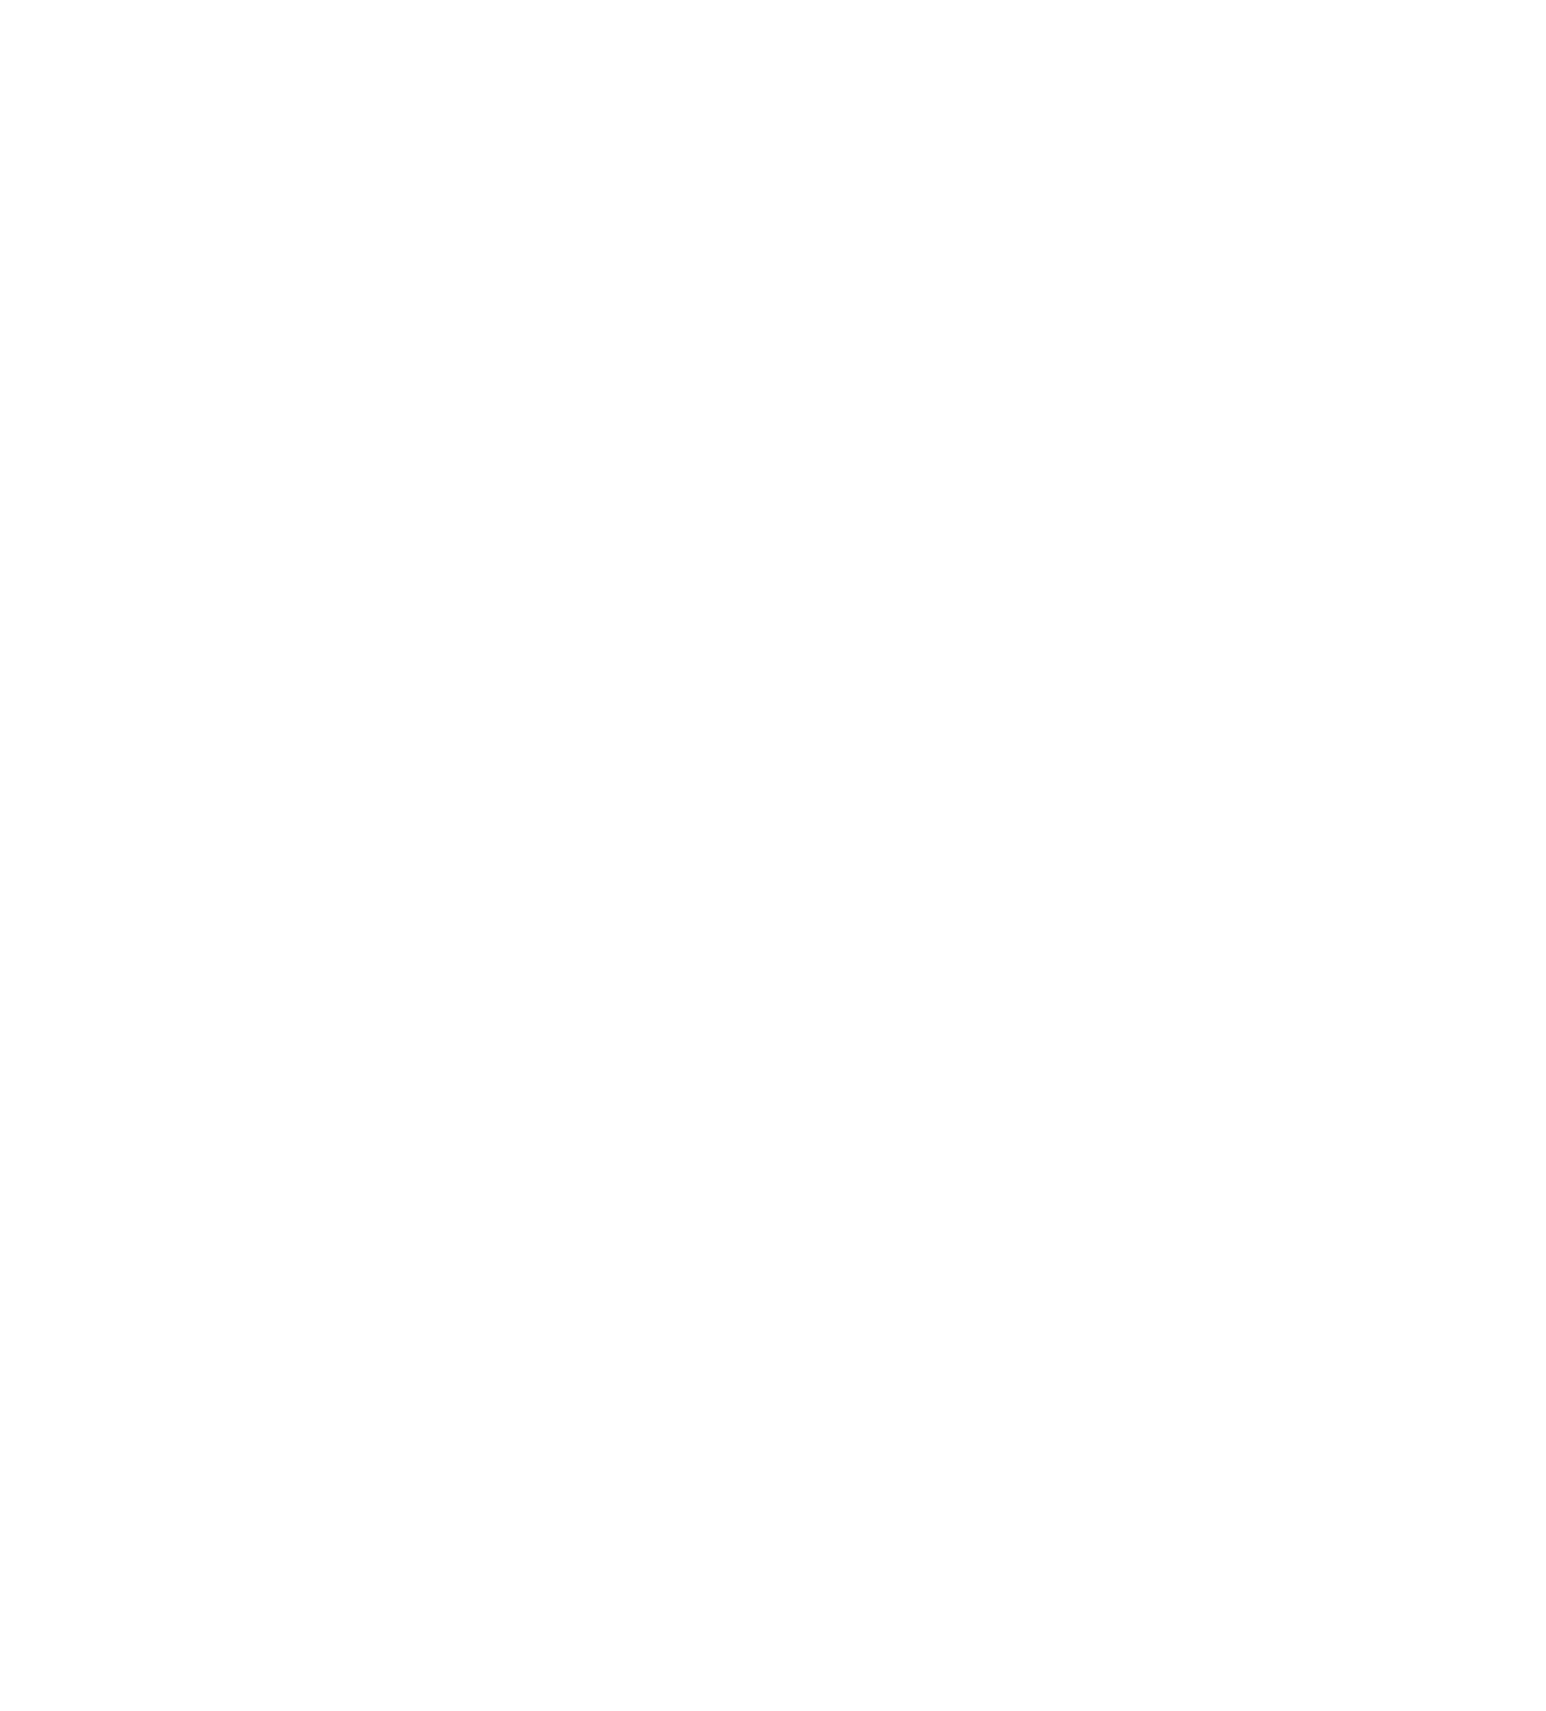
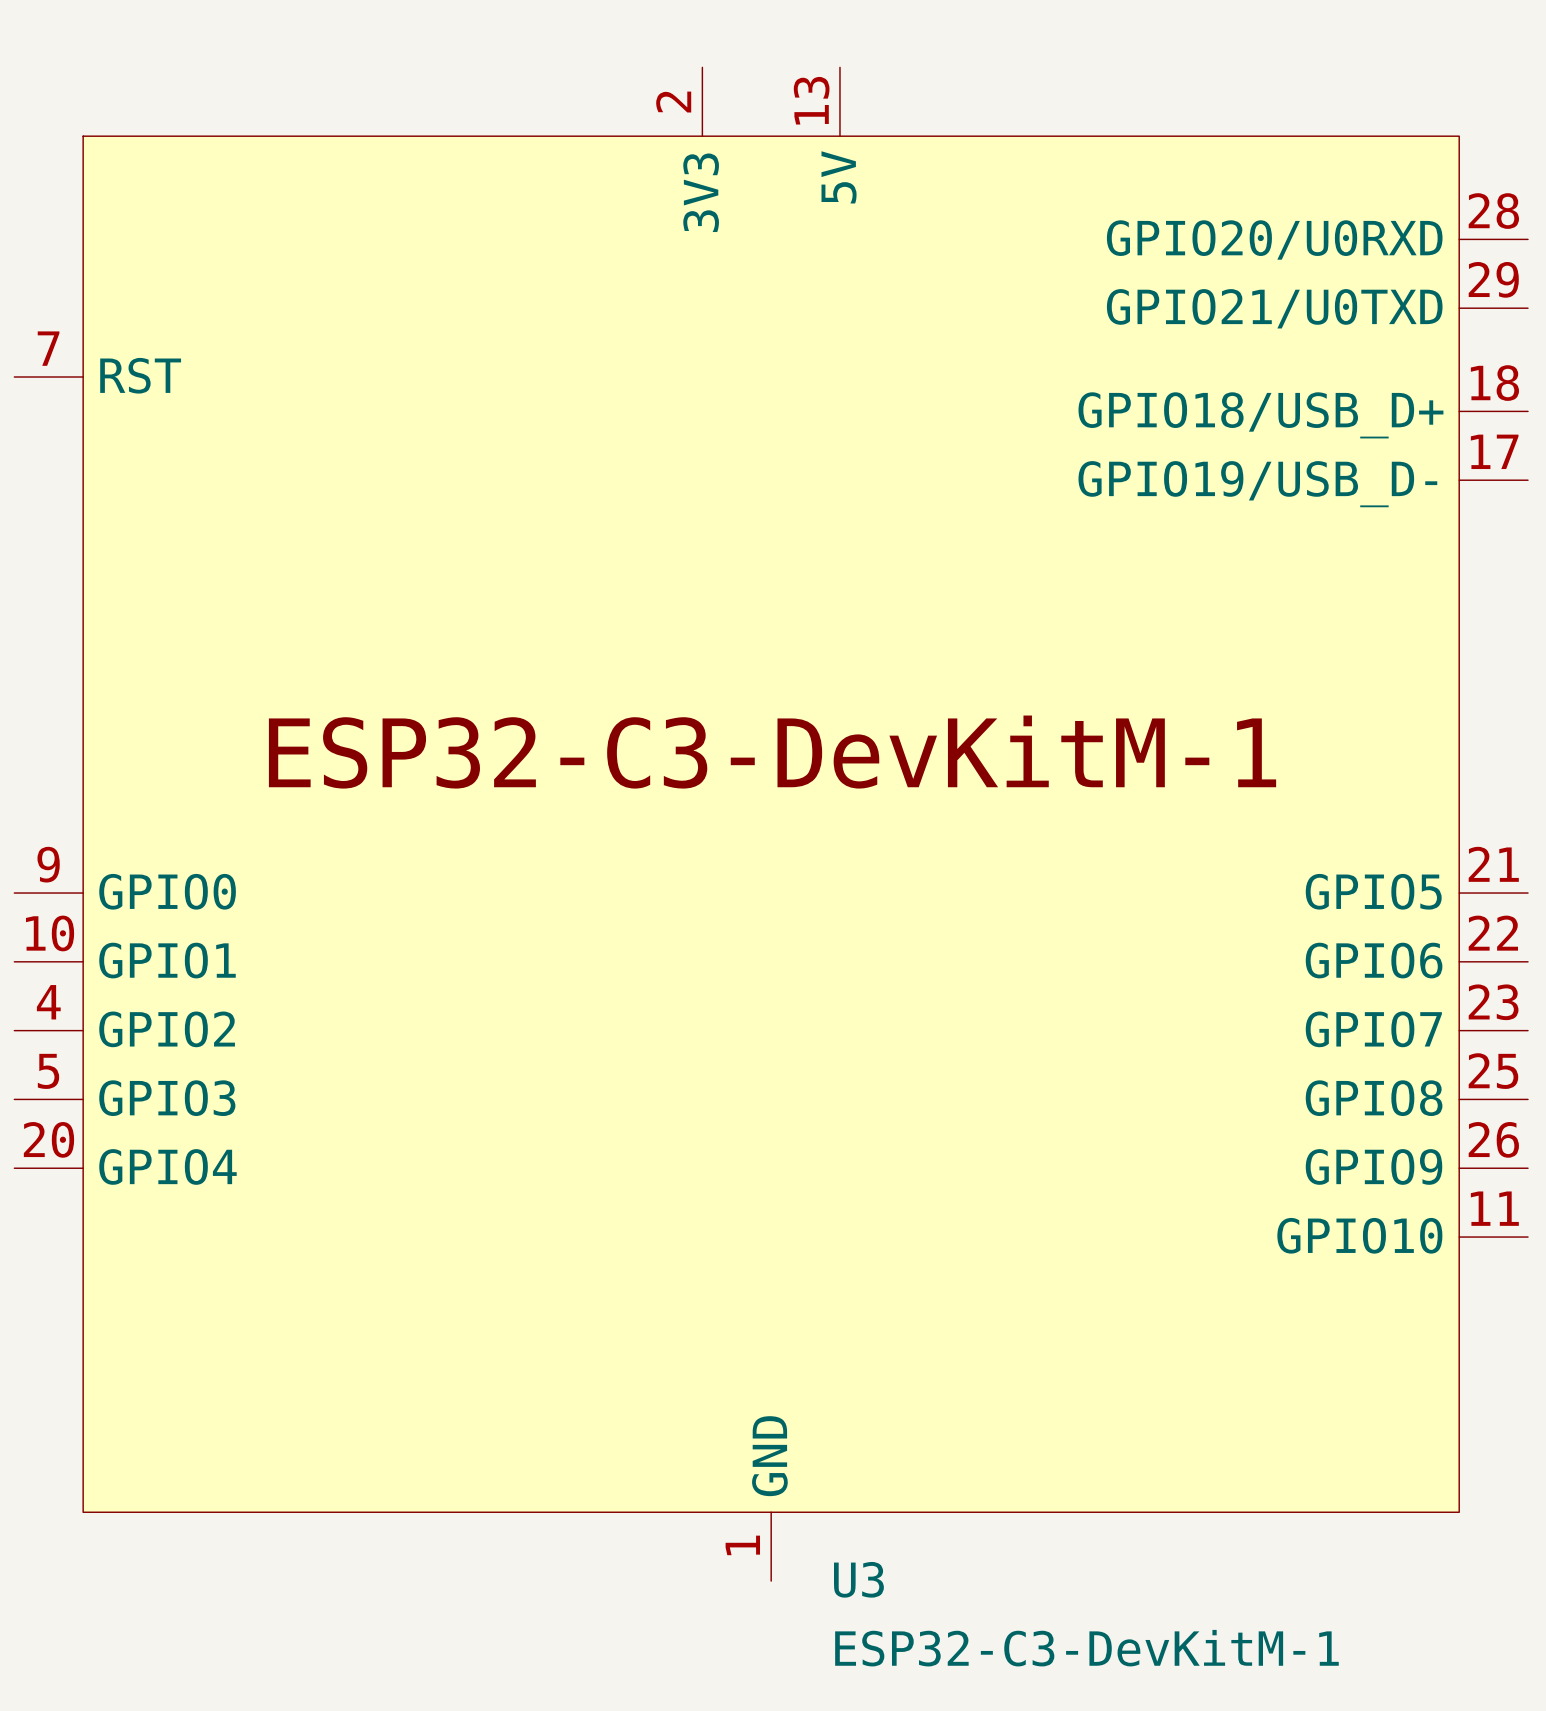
U3: none -> ESP32-C3-DevKitM-1 (771, 824)

